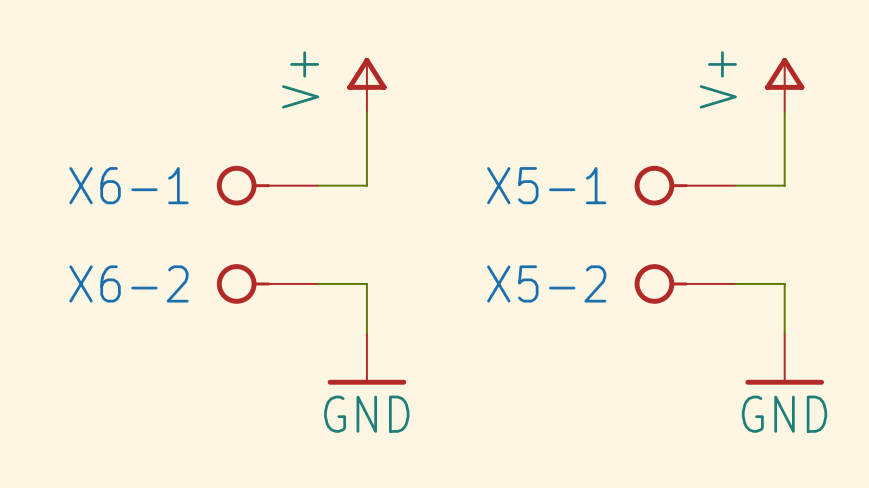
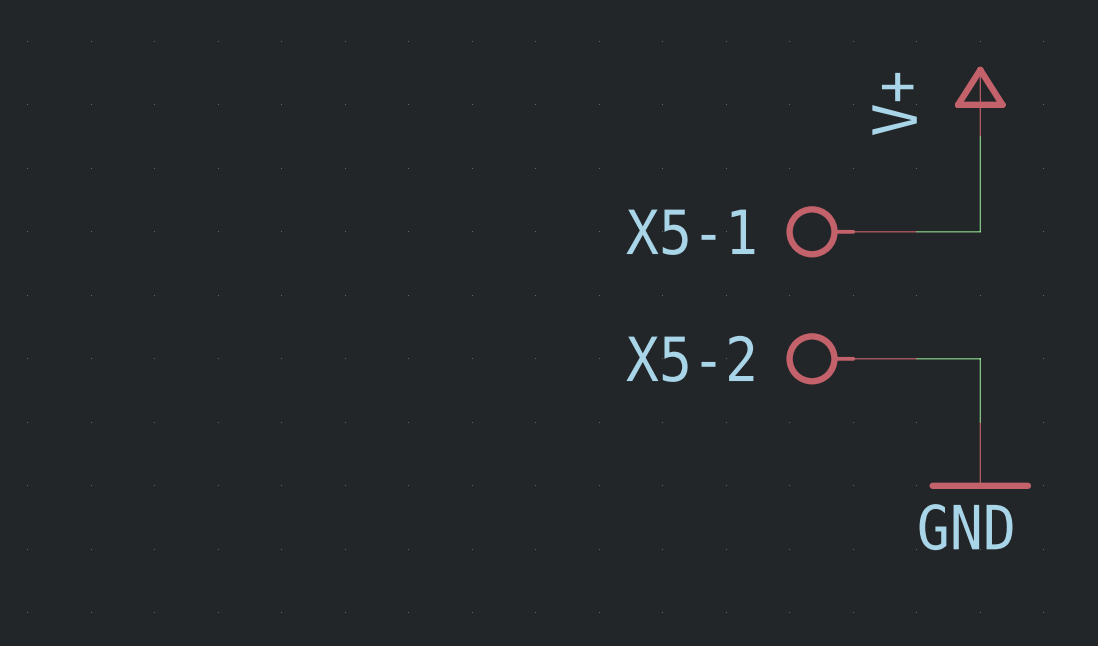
power symbol: V+ (366, 84) -> none
wire: (366, 111) (366, 185) (317, 185) -> none
X6-1: (267, 185) -> none
X6-2: (267, 283) -> none
wire: (317, 283) (366, 283) (366, 333) -> none
power symbol: GND (366, 358) -> none

